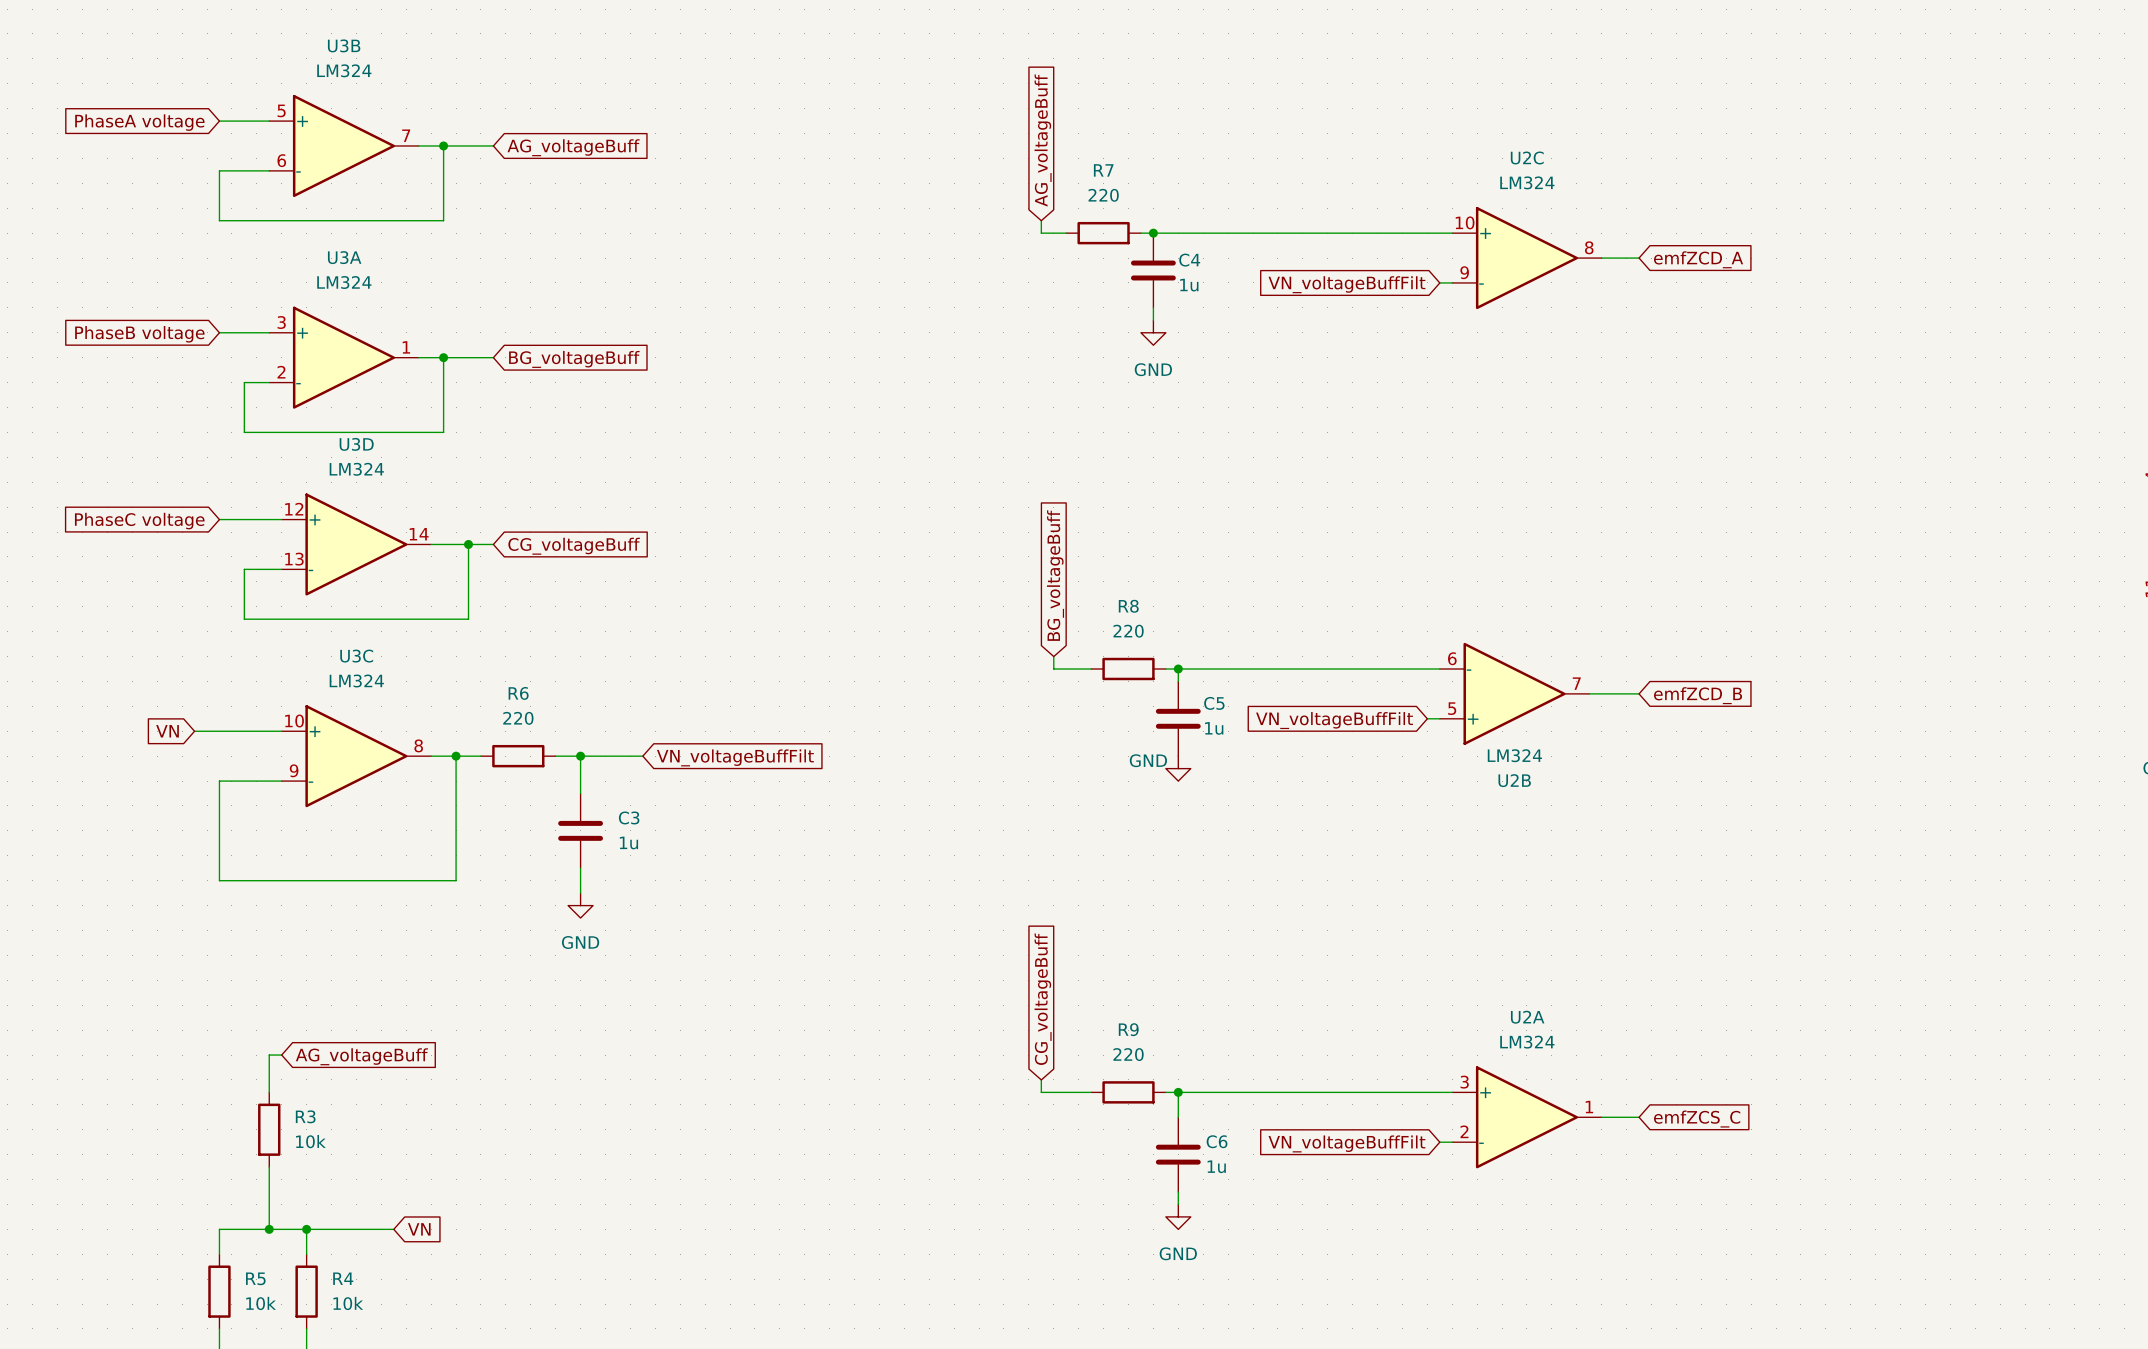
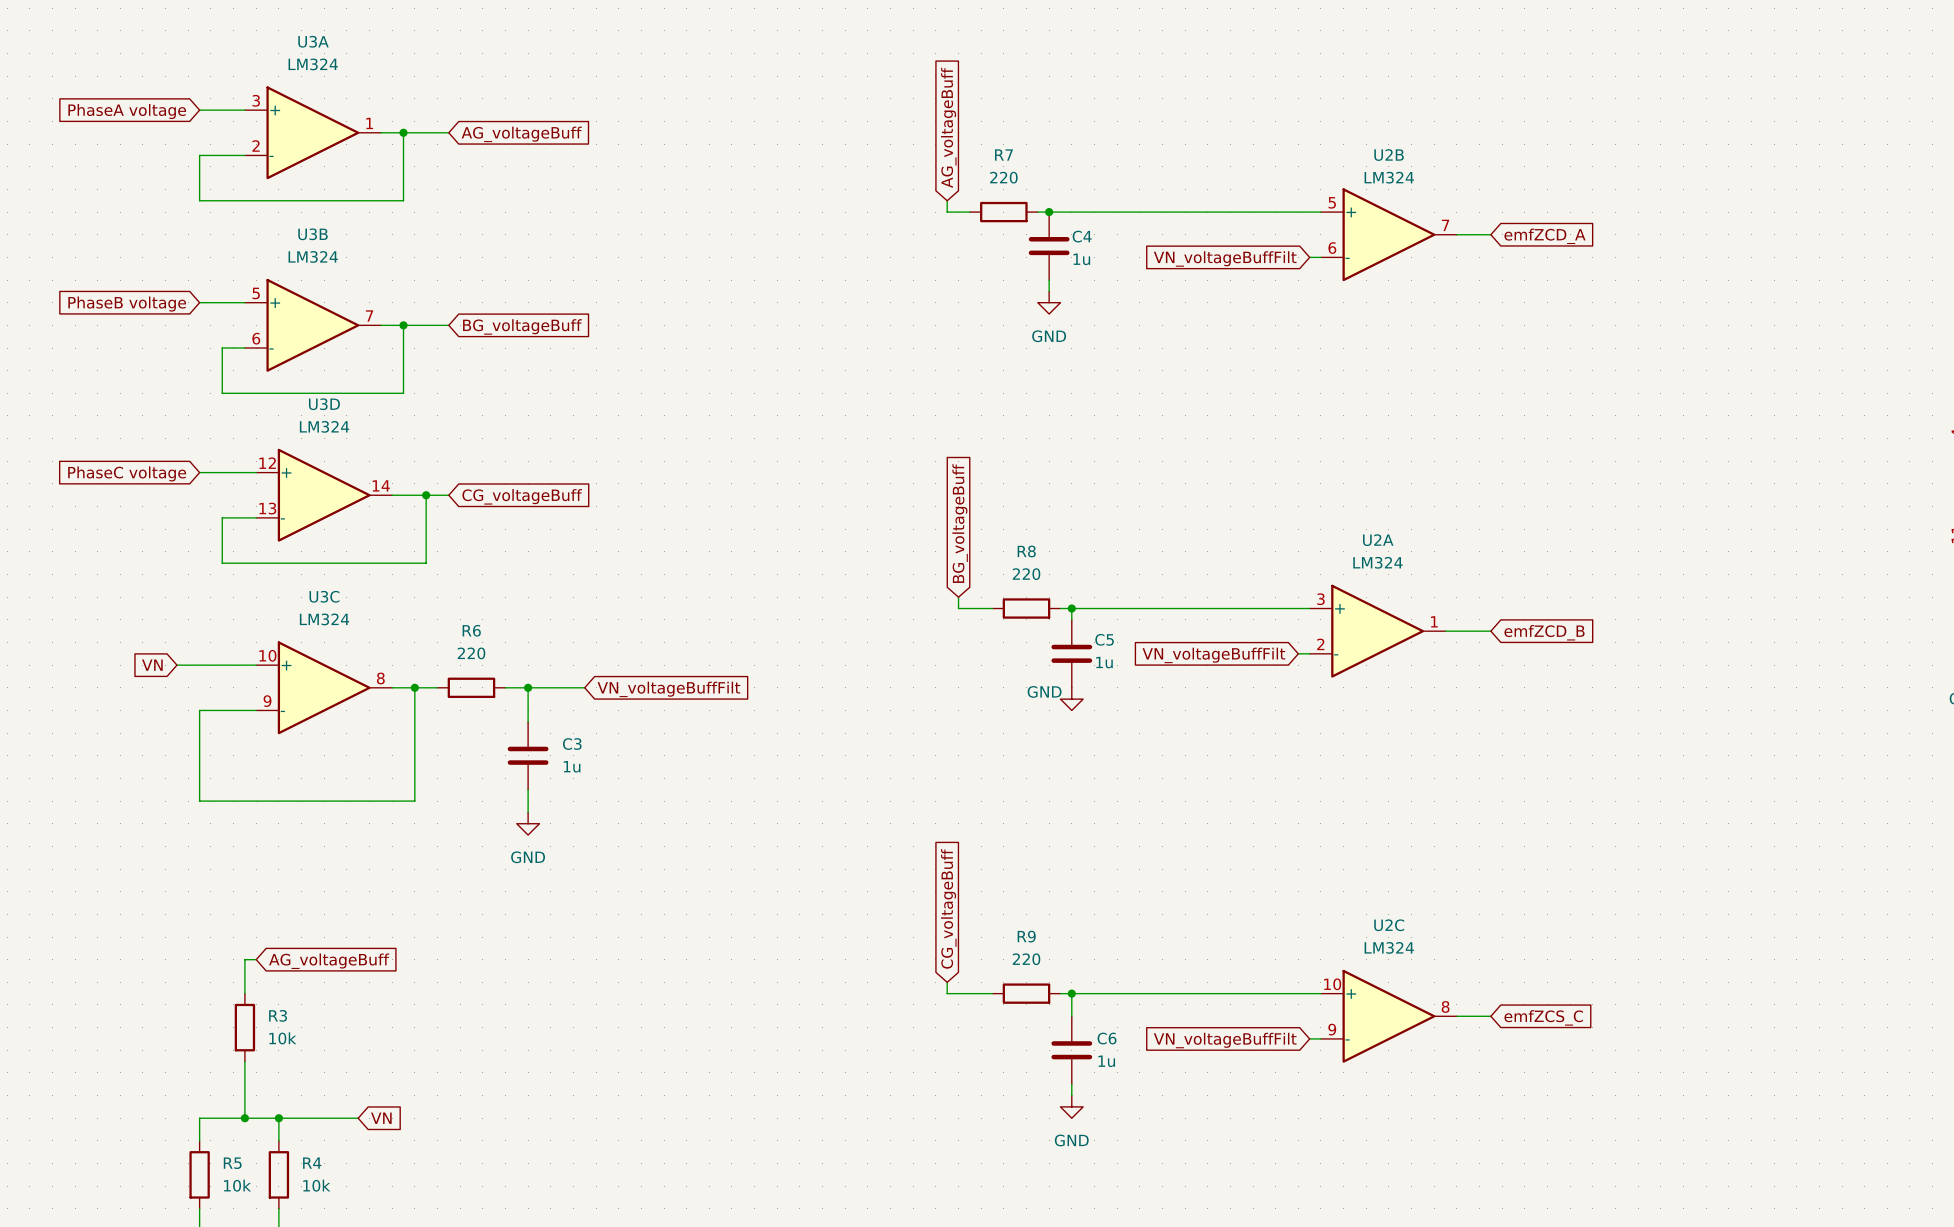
U3B position: (343, 145) -> (312, 325)
U2C position: (1526, 258) -> (1388, 1016)
U3A position: (343, 357) -> (312, 132)
U2B flip: as is (1514, 693) -> up-down (1388, 234)
U2B position: (1514, 693) -> (1388, 234)
U2A position: (1526, 1117) -> (1377, 631)

